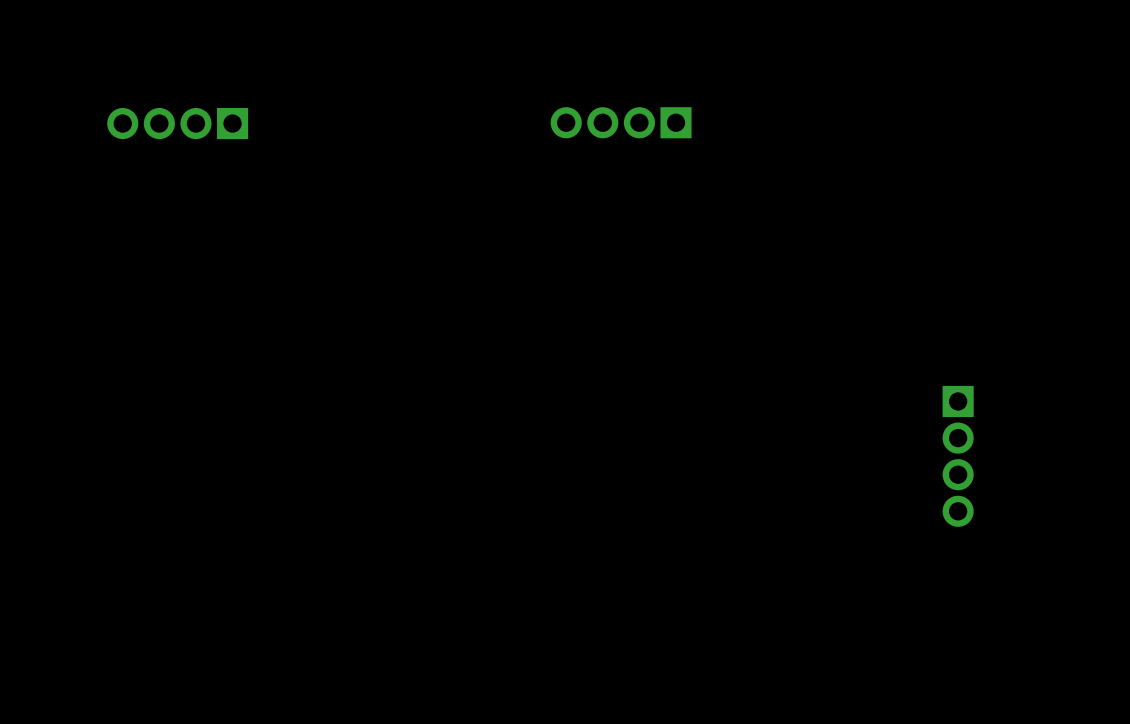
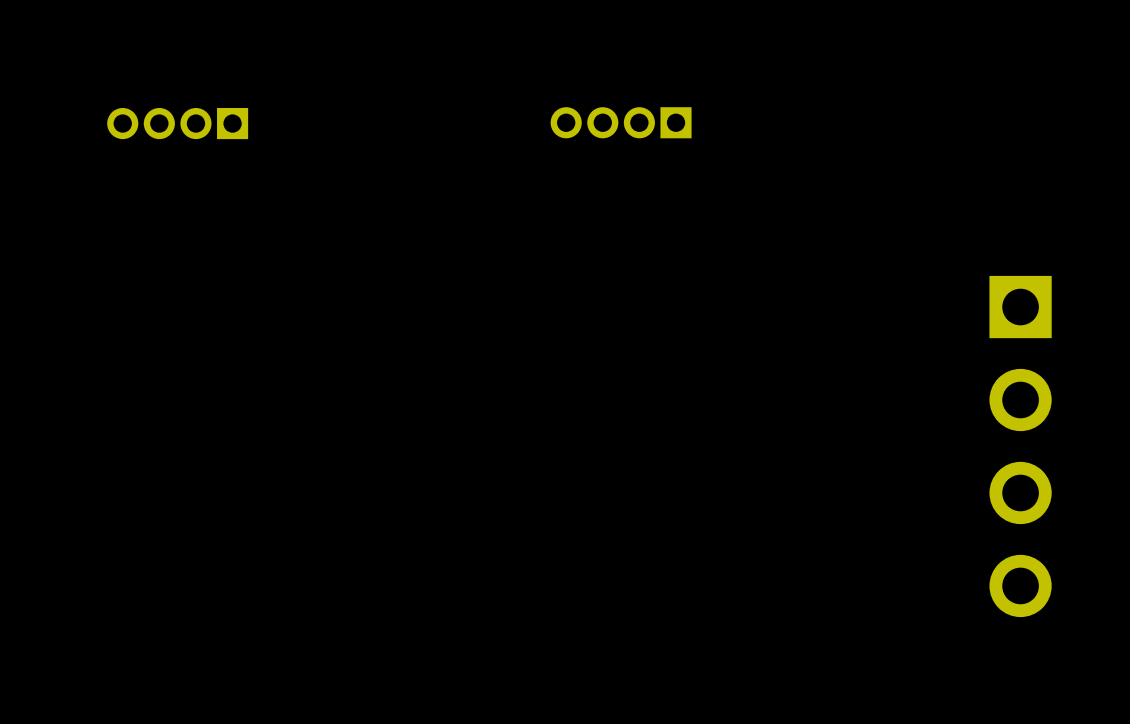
part: none -> (1020, 446)
part: (958, 456) -> none

